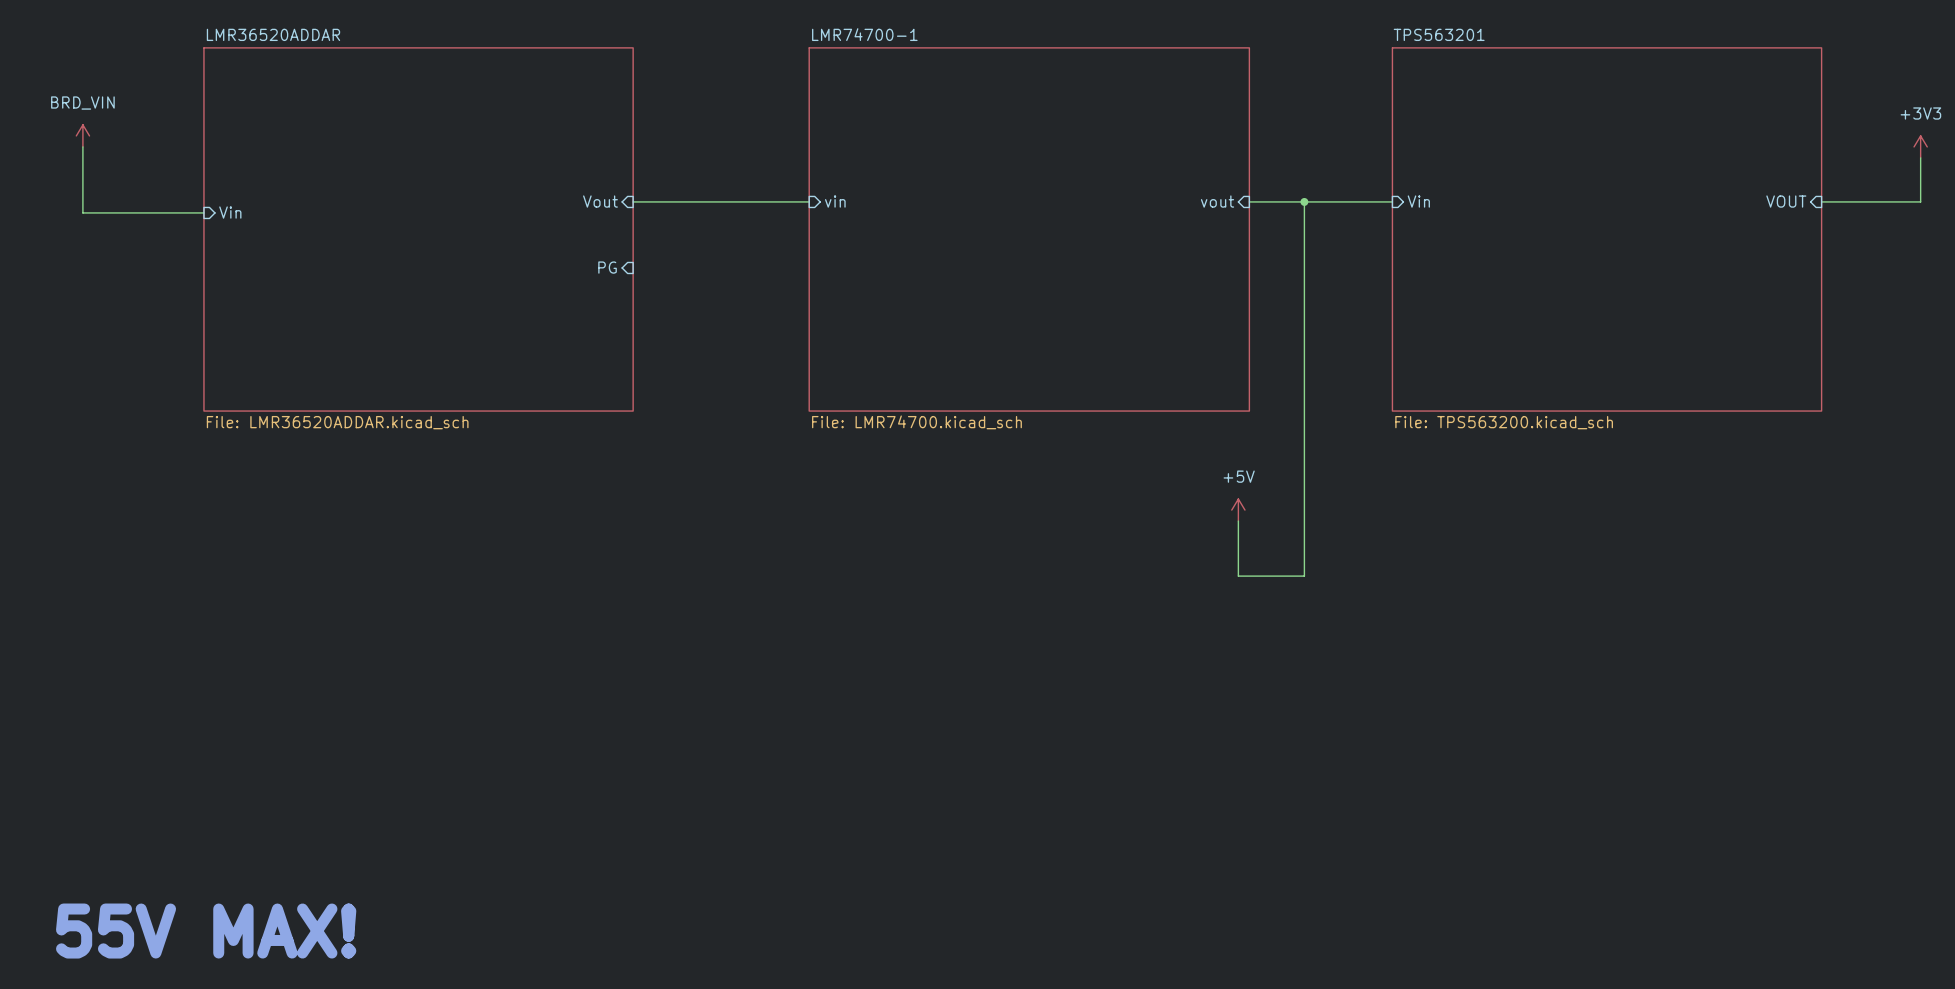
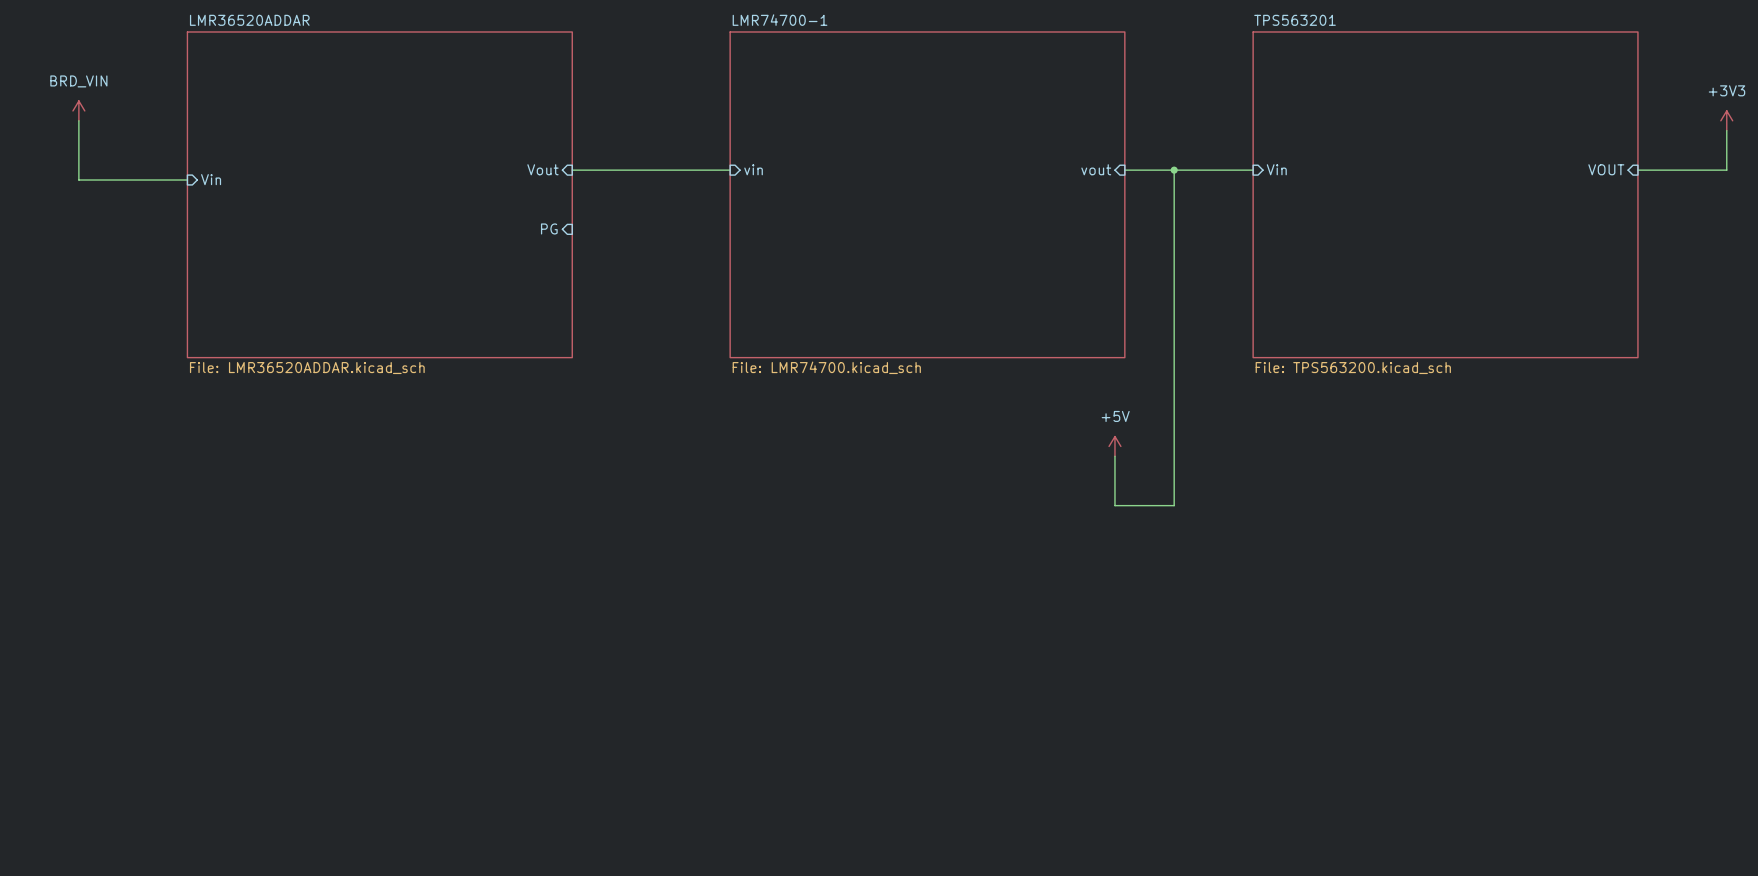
text: 55V MAX! (206, 931) -> none

